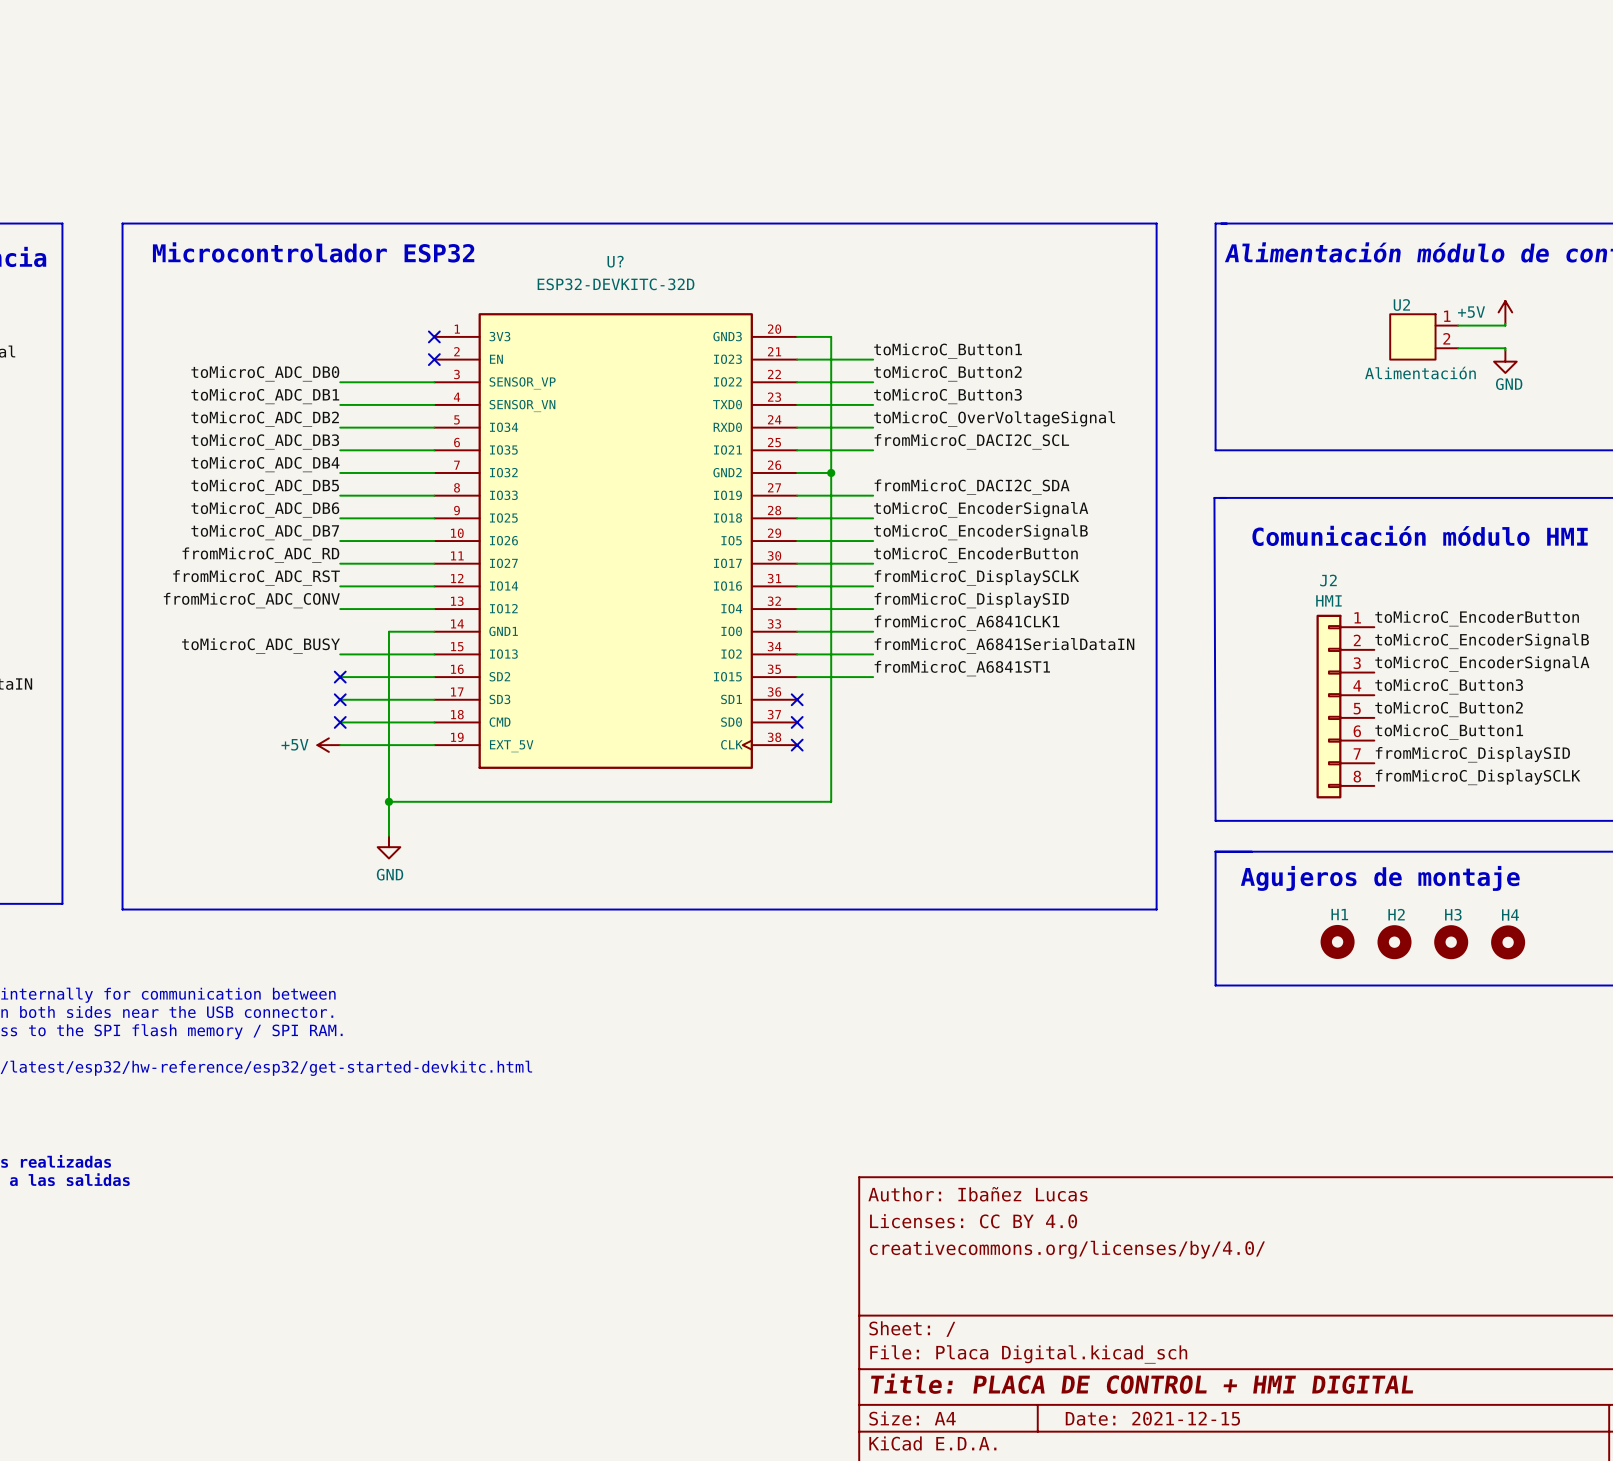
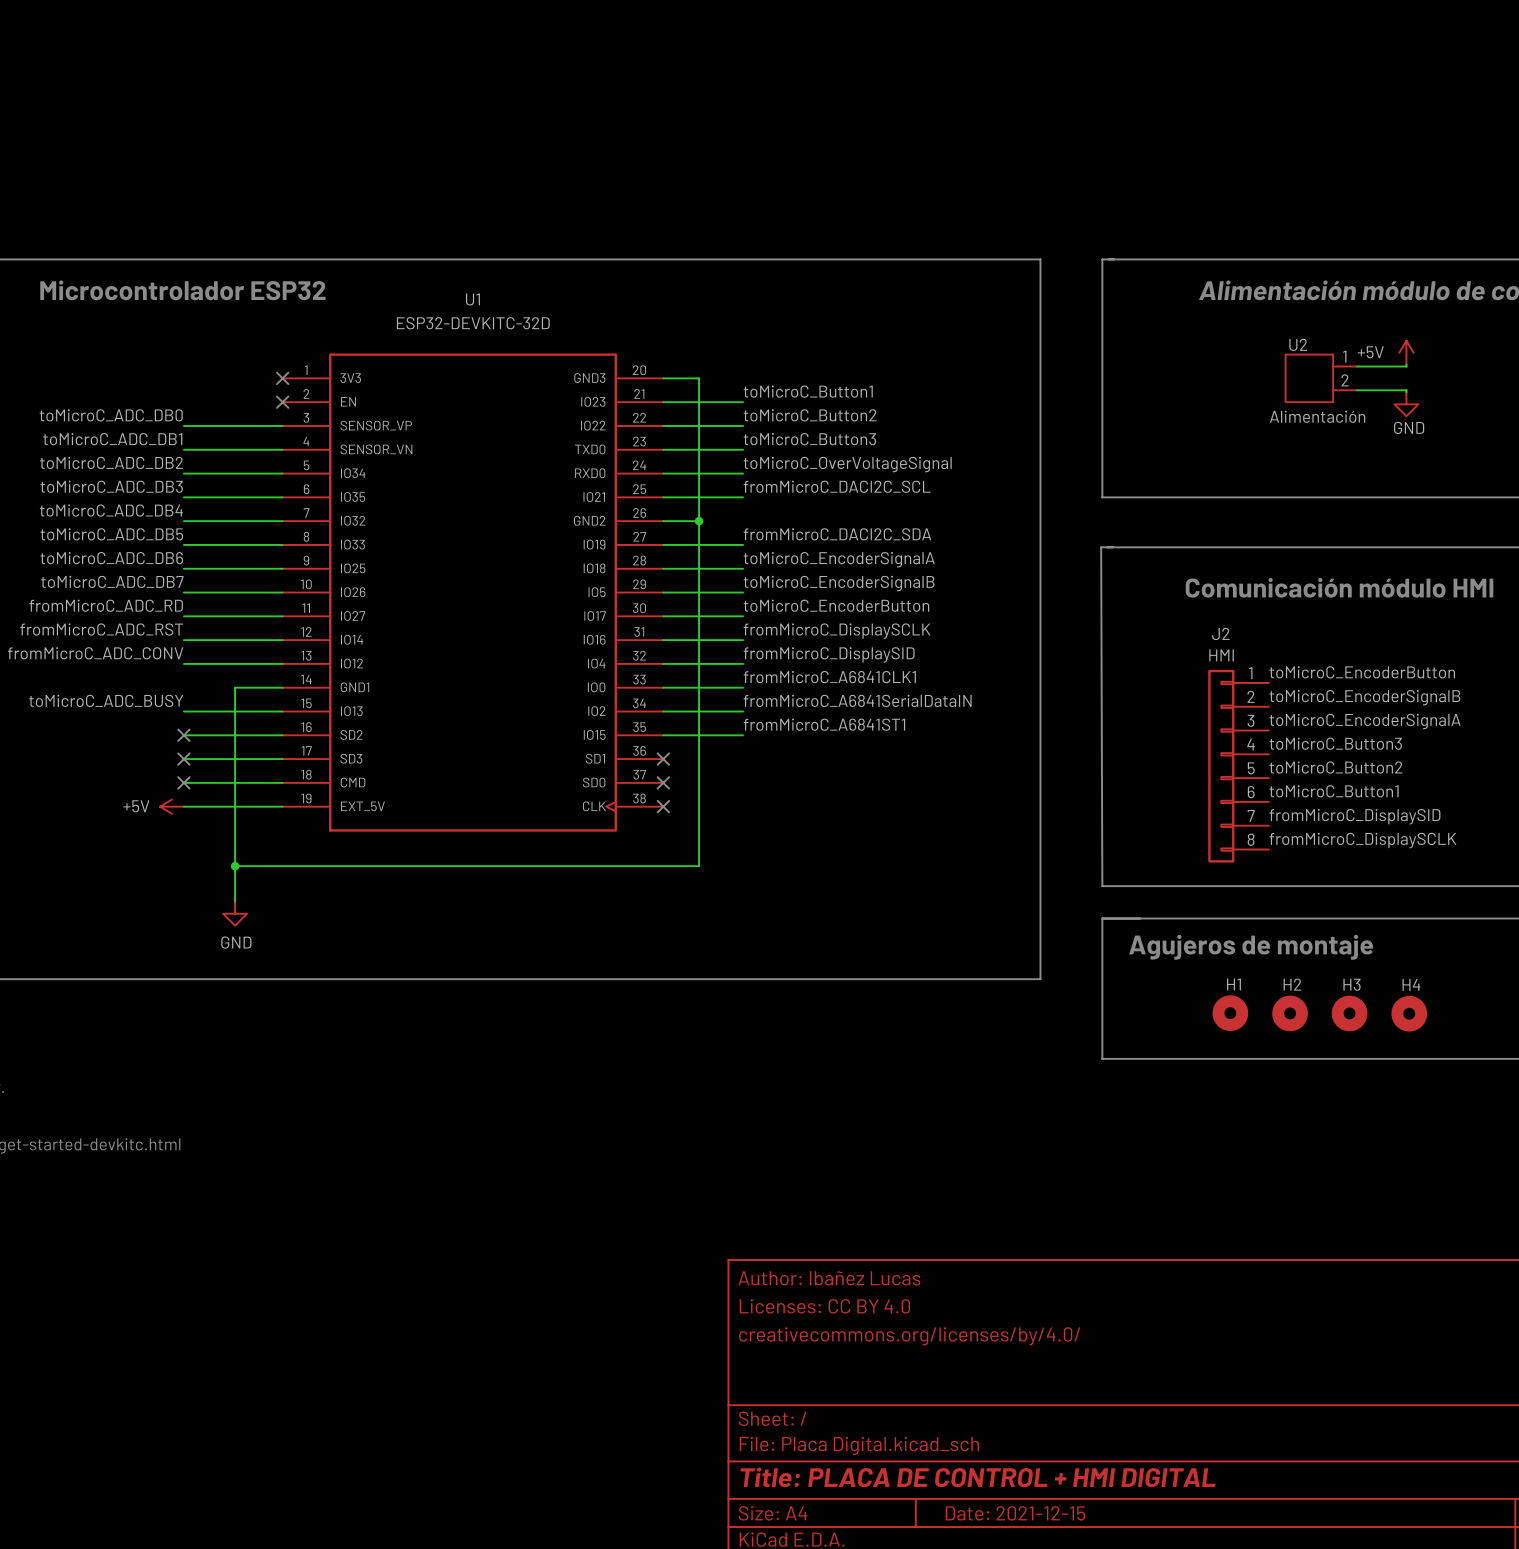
U? name: U? (615, 261) -> U1 (472, 299)

